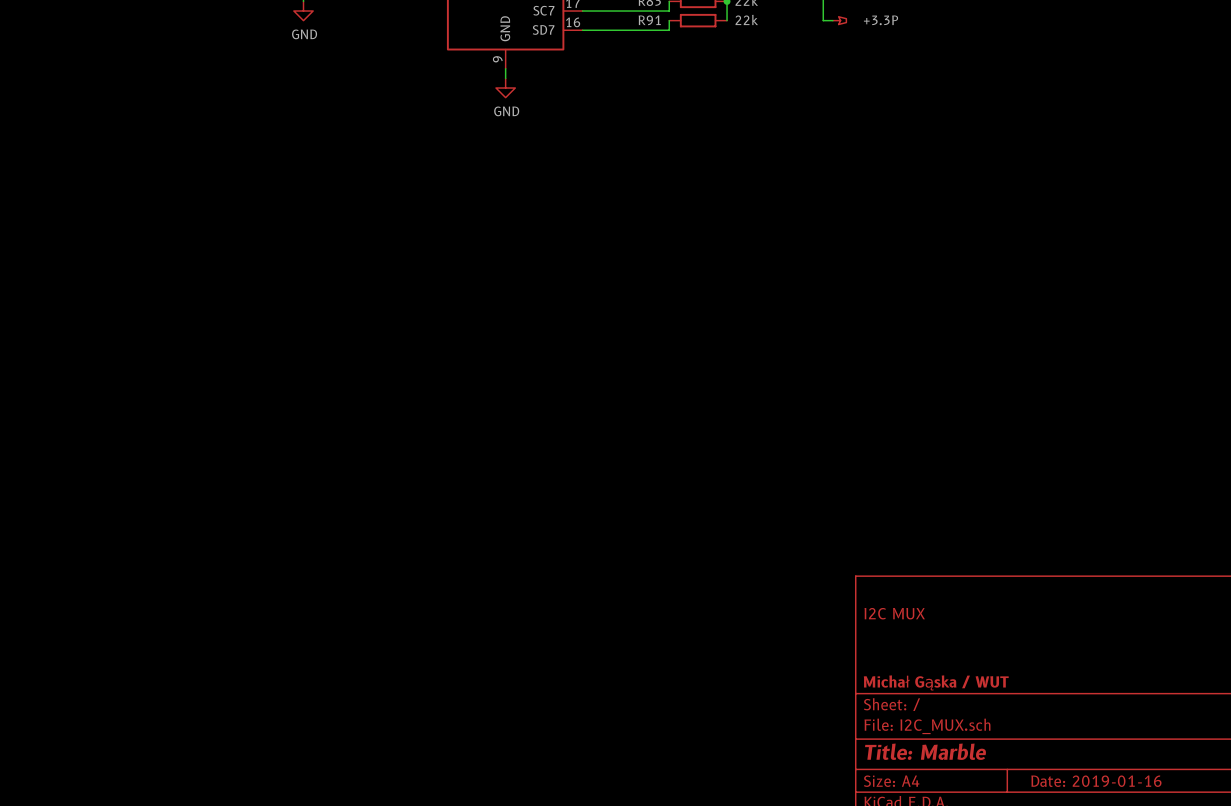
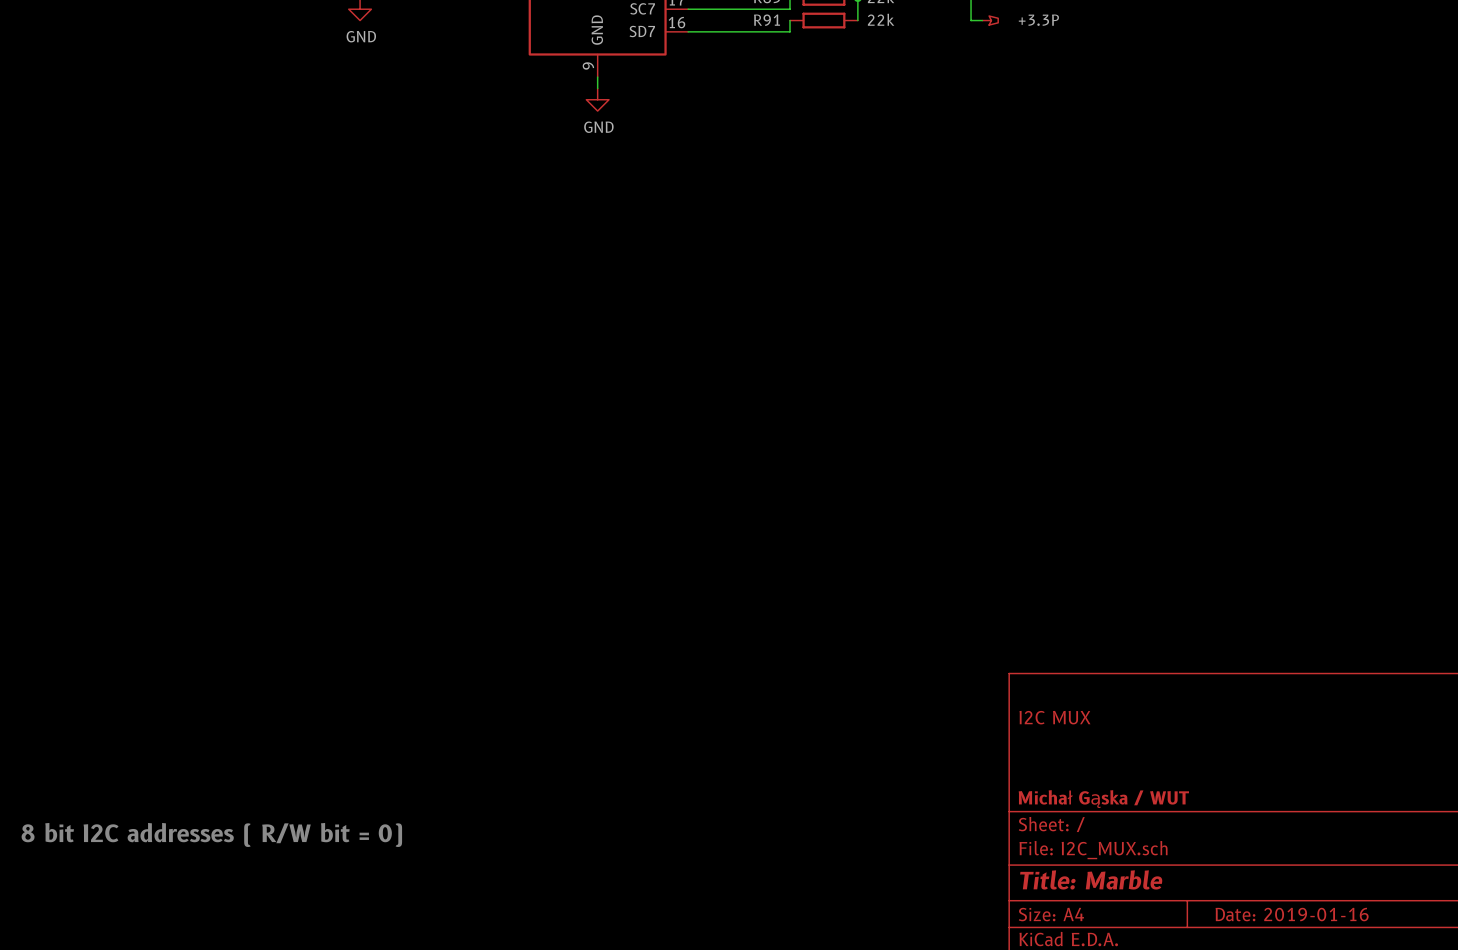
text: none -> 8 bit I2C addresses ( R/W bit = 0) (211, 834)

